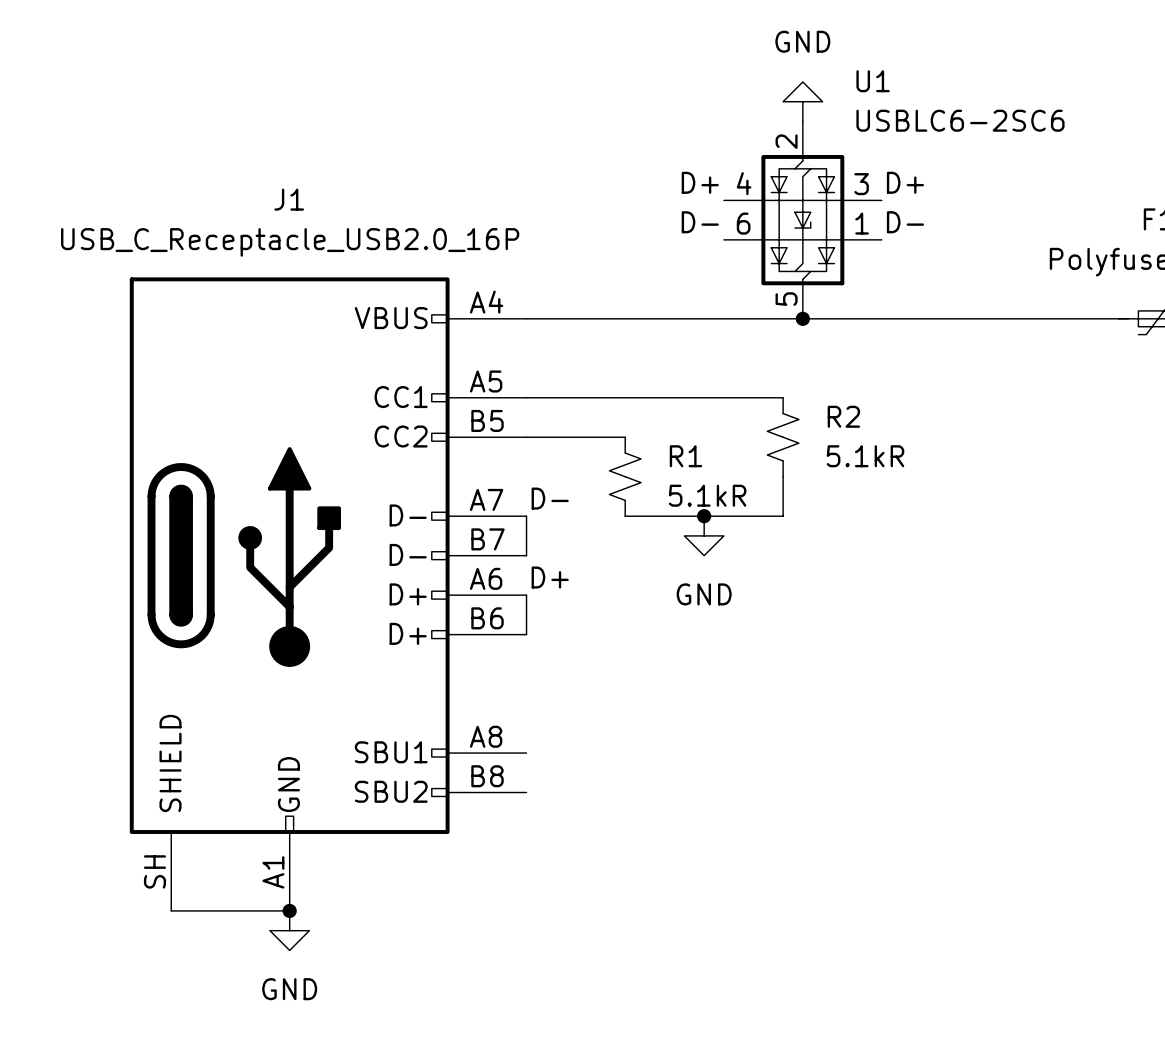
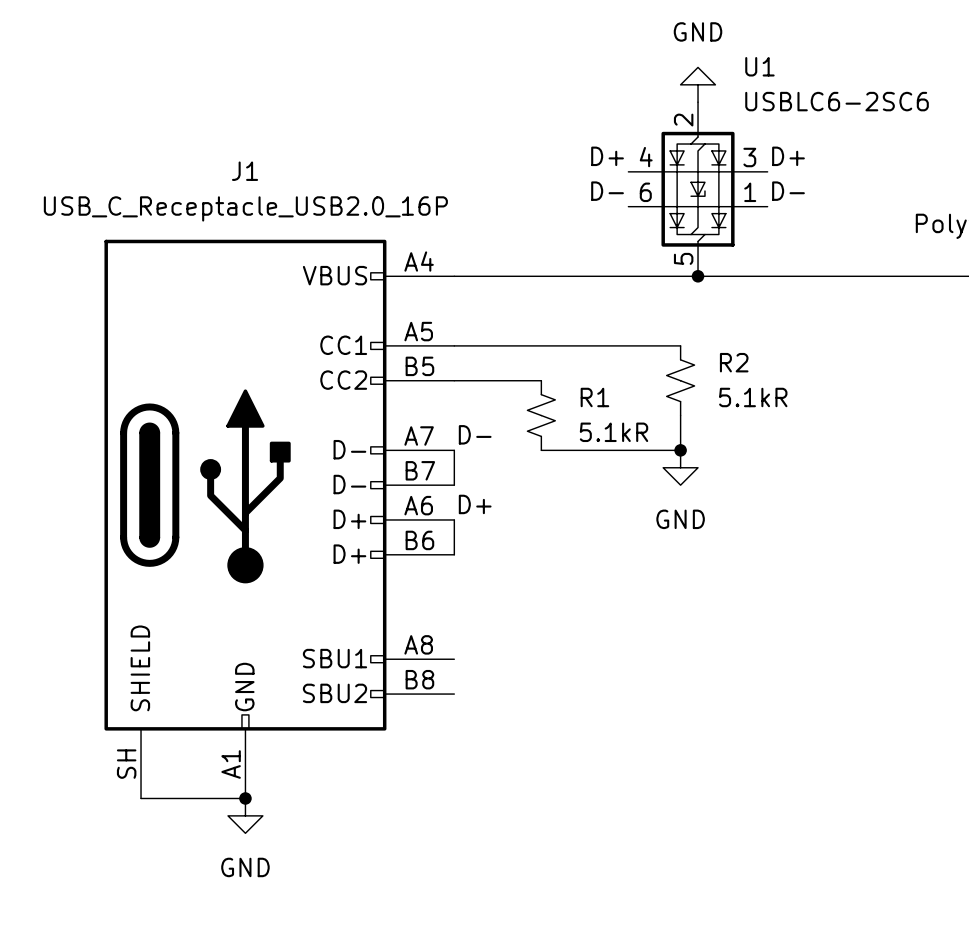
junction position: (704, 516) -> (680, 450)
power symbol position: GND (704, 535) -> GND (680, 467)

